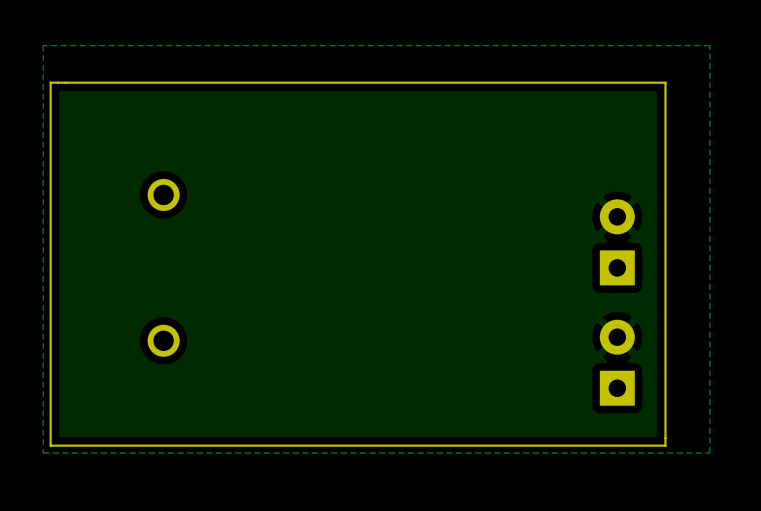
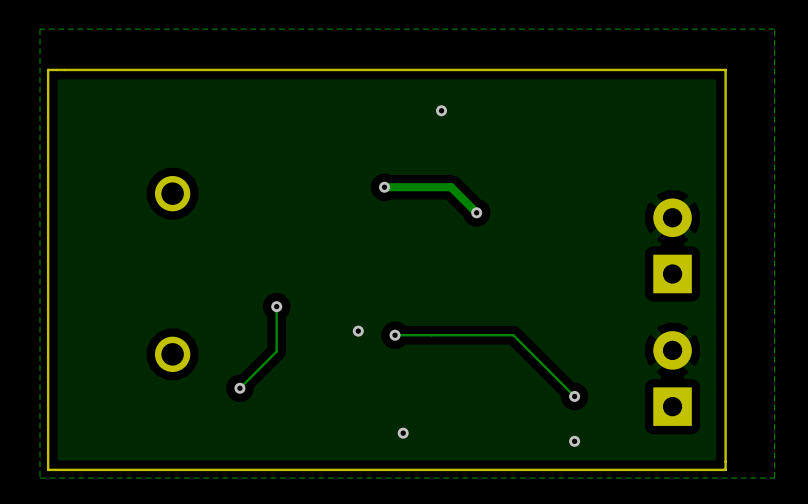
via: none -> (441, 110)
track: none -> (384, 187) (451, 187) (476, 212)
via: none -> (384, 187)
via: none -> (476, 212)
track: none -> (276, 306) (276, 351) (239, 388)
via: none -> (276, 306)
via: none -> (358, 331)
track: none -> (395, 335) (513, 335) (574, 396)
via: none -> (395, 335)
via: none -> (239, 388)
via: none -> (574, 396)
via: none -> (403, 433)
via: none -> (574, 441)

